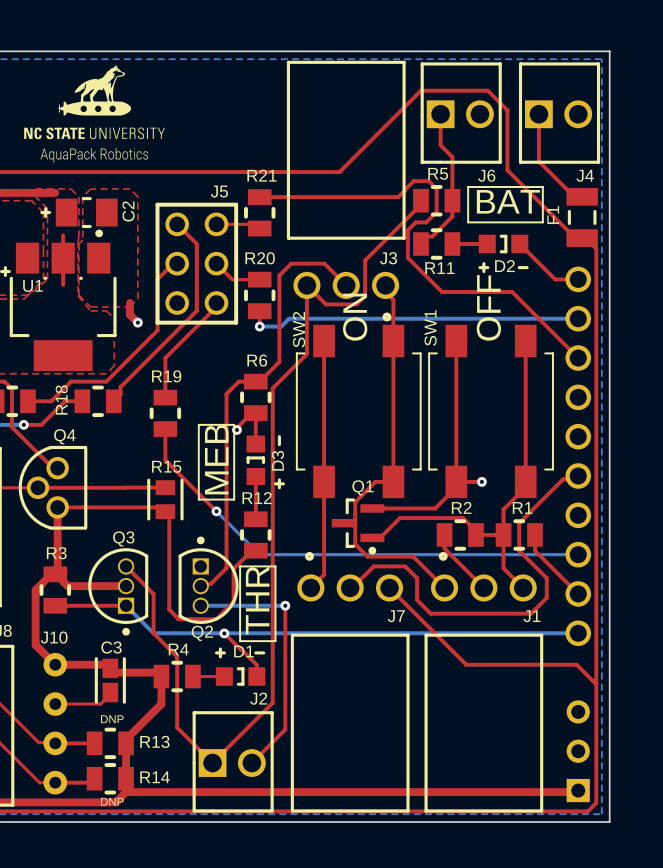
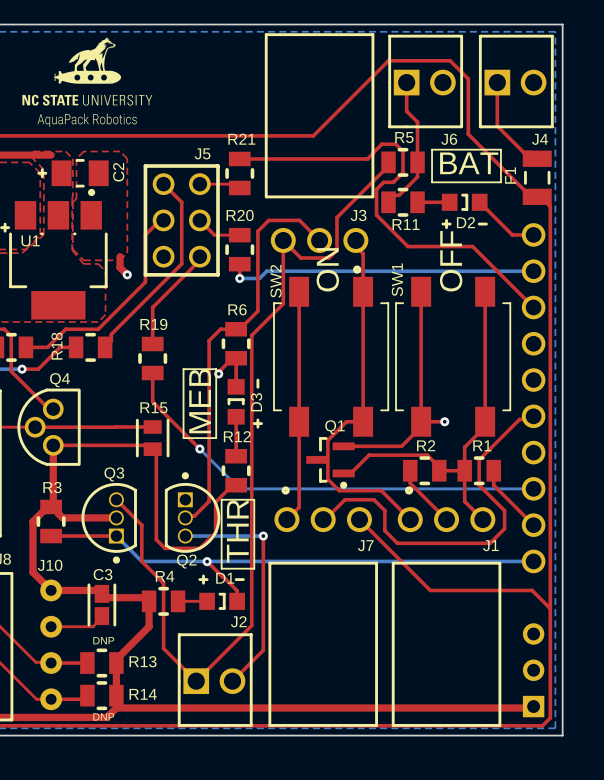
top track: (63, 235) (63, 284) -> none

